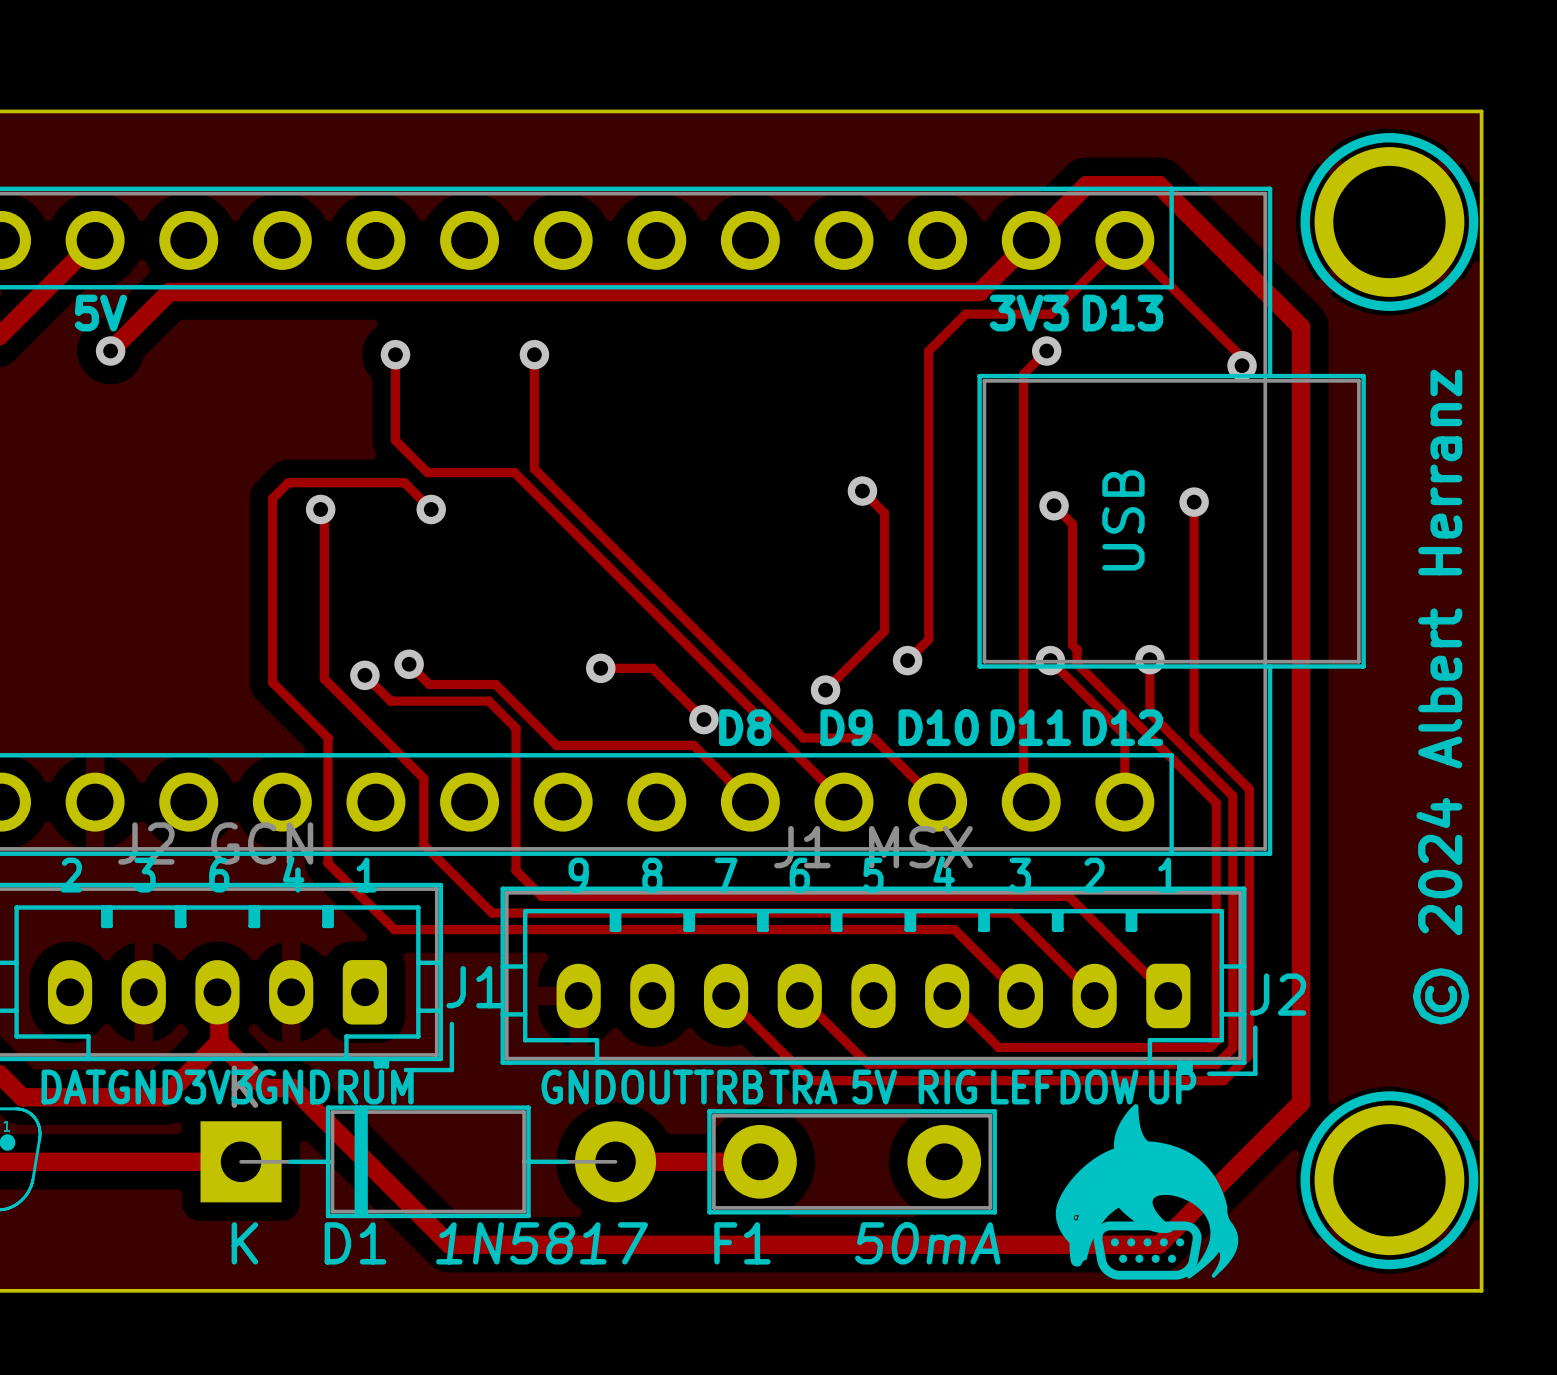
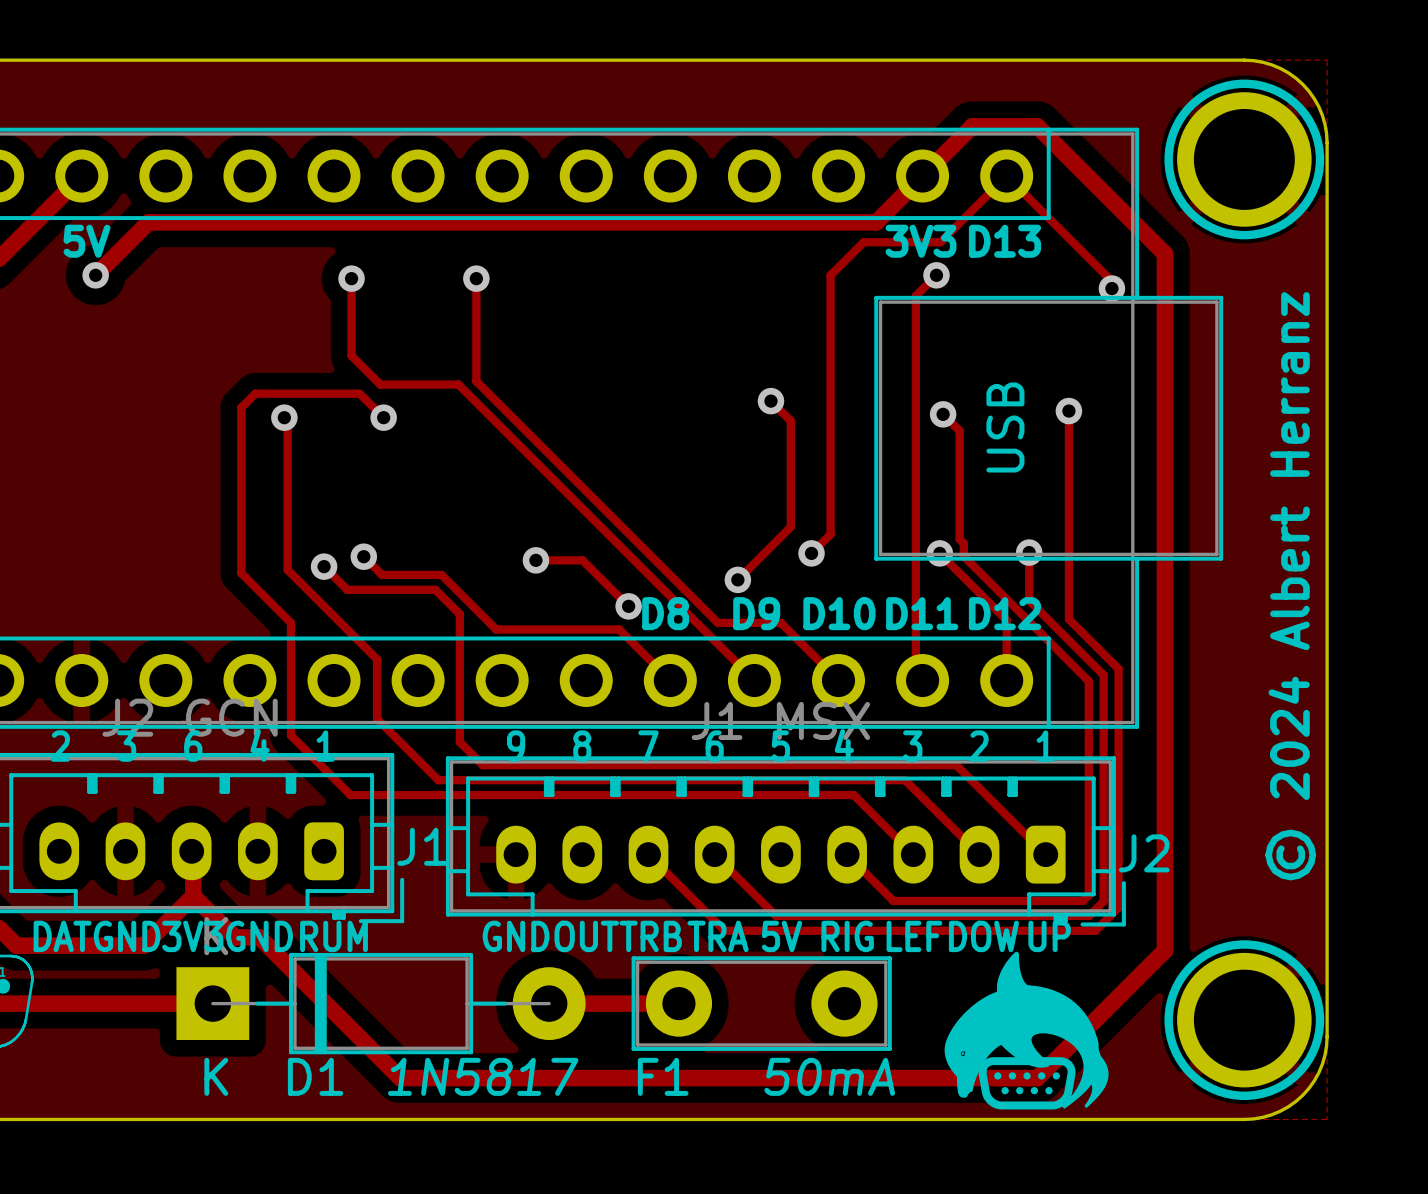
board edge: (1389, 111) (1481, 111) (1481, 203) -> (1244, 60) (1262, 62) (1280, 68) (1302, 84) (1314, 98) (1322, 115) (1327, 142)
board edge: (1481, 1198) (1481, 1290) (1389, 1290) -> (1327, 1036) (1325, 1055) (1318, 1072) (1302, 1095) (1288, 1106) (1271, 1114) (1244, 1119)

